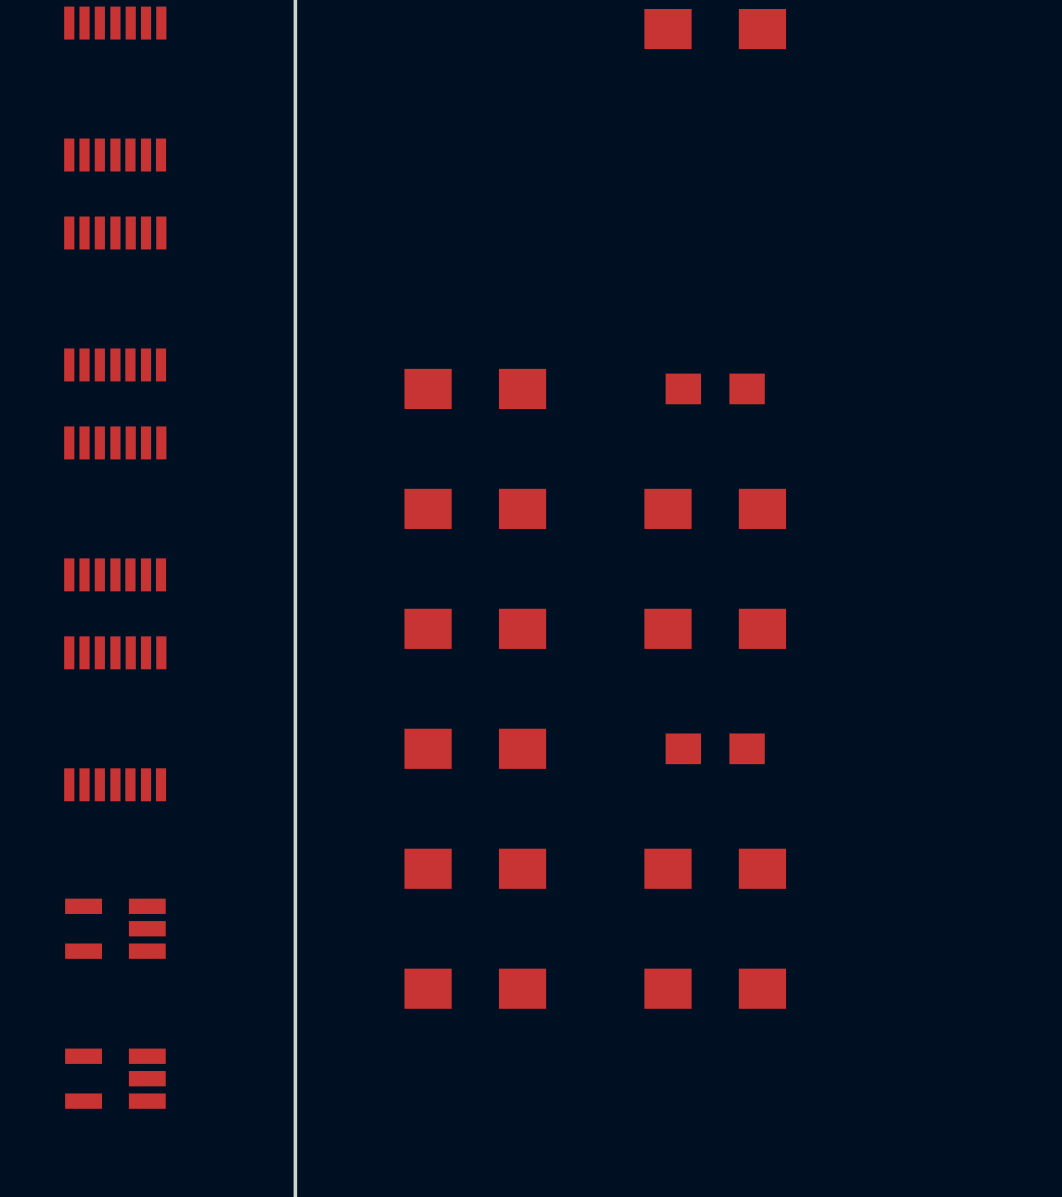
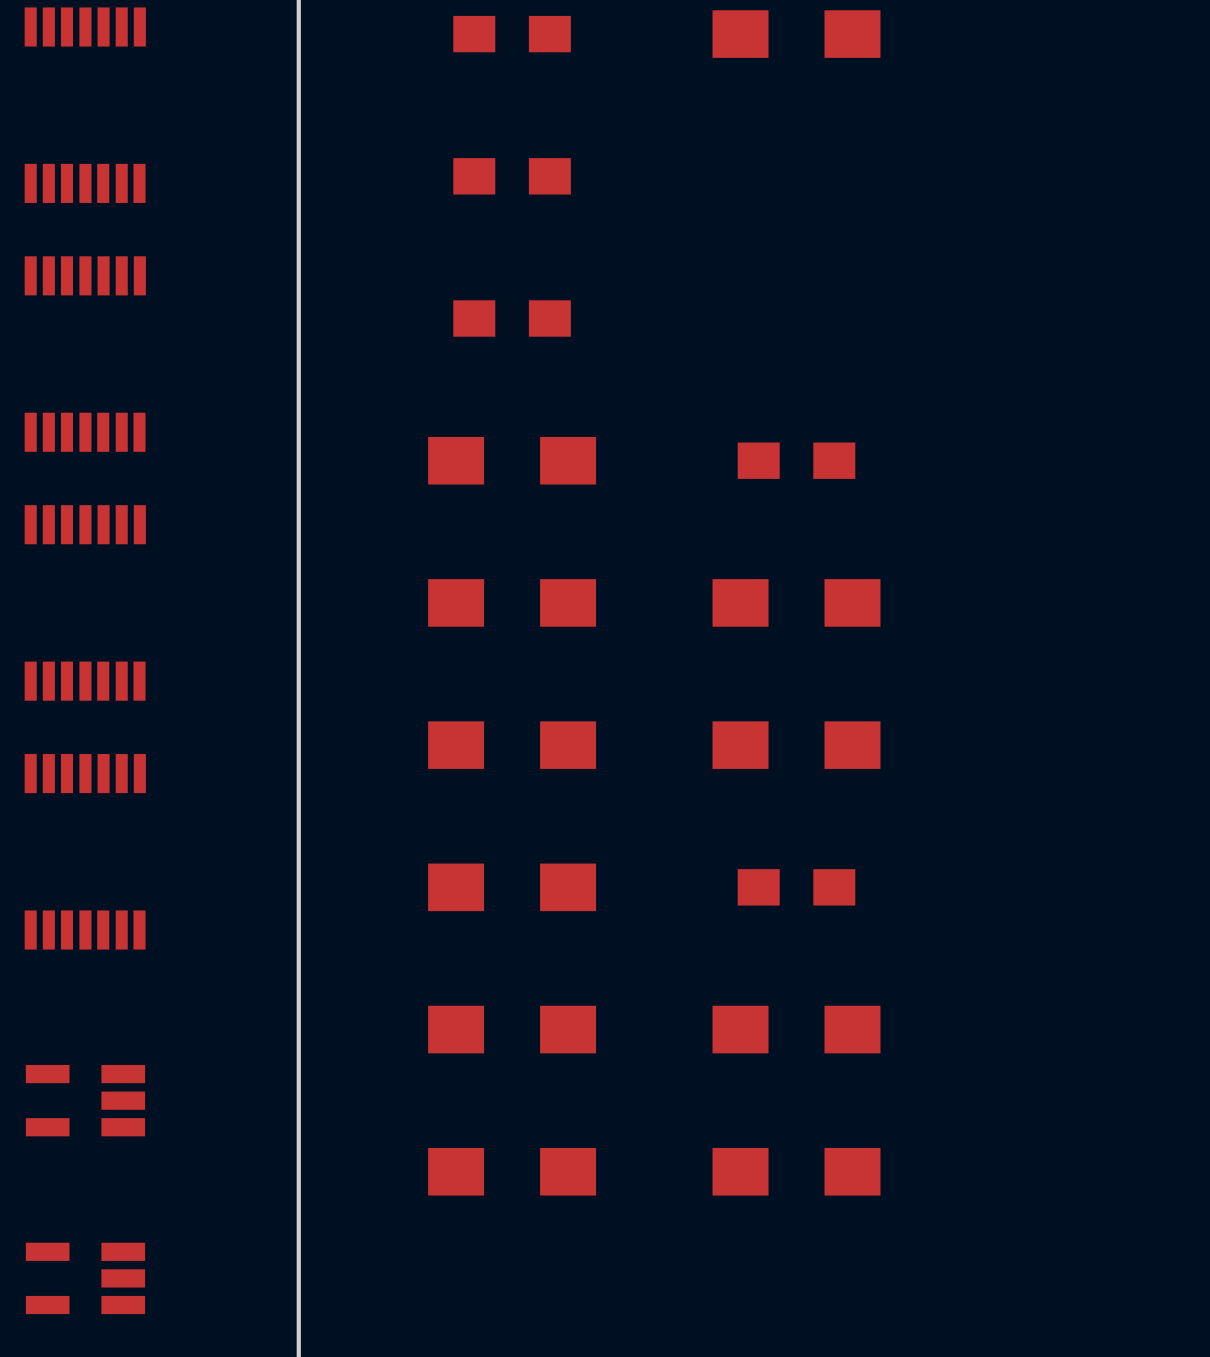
part: none -> (512, 34)
part: none -> (512, 176)
part: none -> (512, 318)

